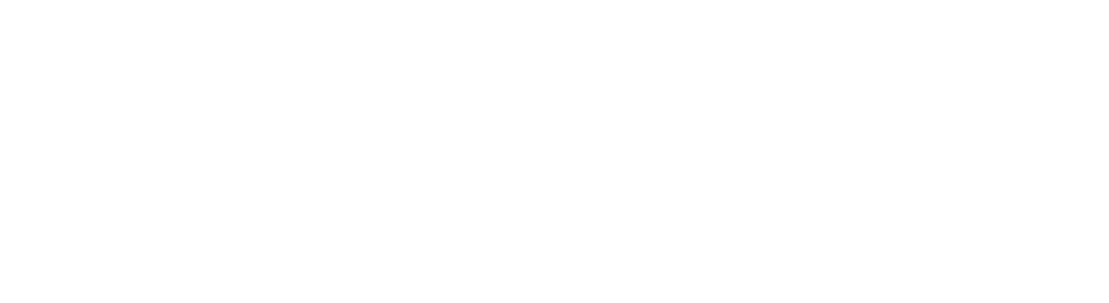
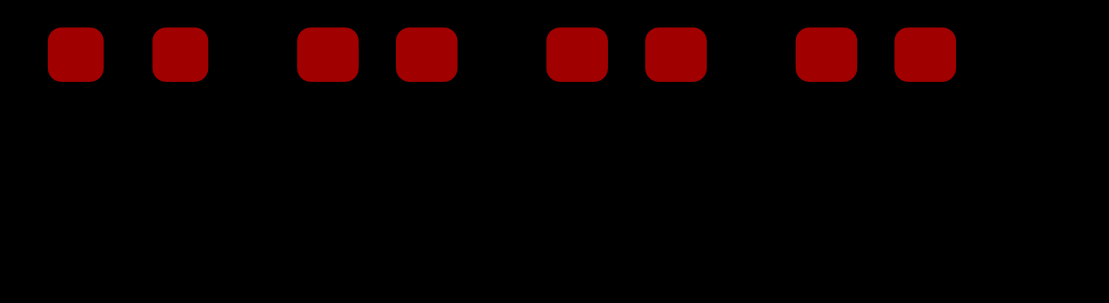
part: none -> (128, 54)
part: none -> (377, 54)
part: none -> (626, 54)
part: none -> (875, 54)

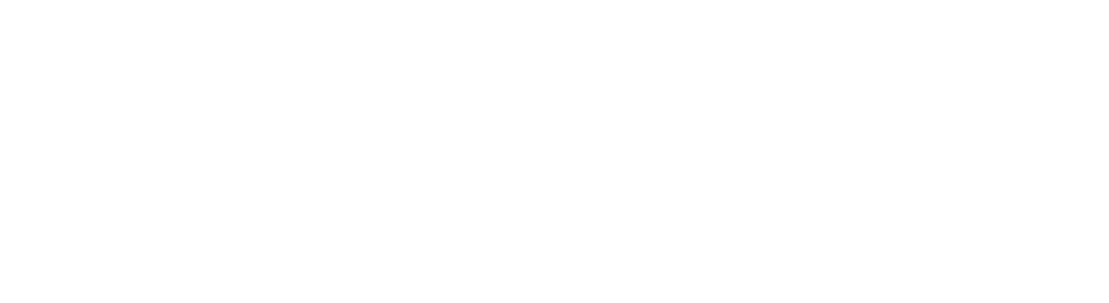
part: (128, 54) -> none
part: (377, 54) -> none
part: (626, 54) -> none
part: (875, 54) -> none

